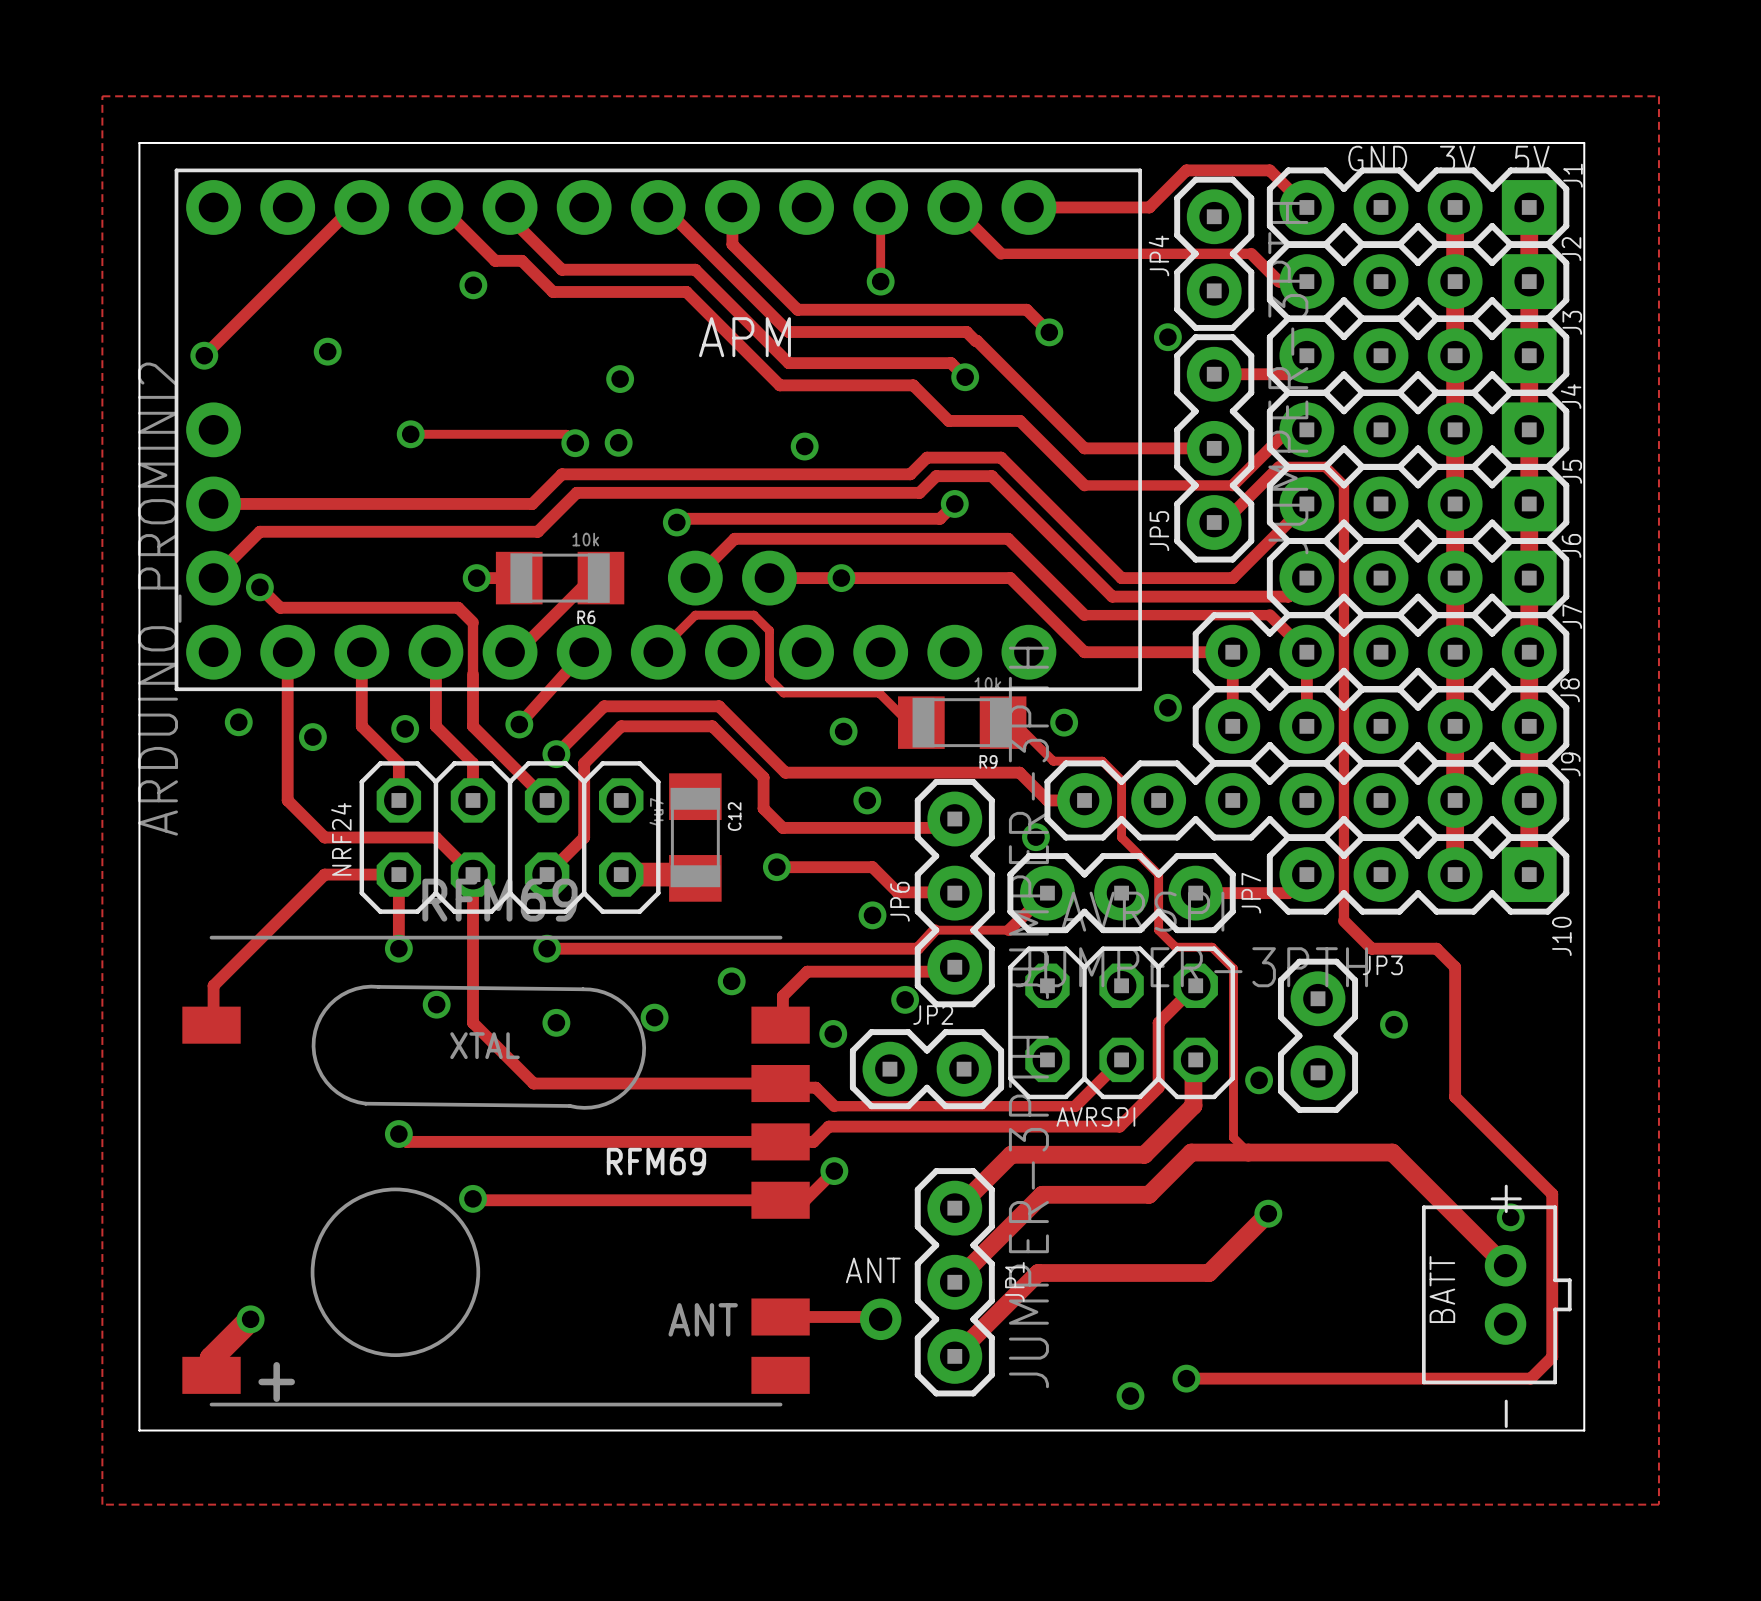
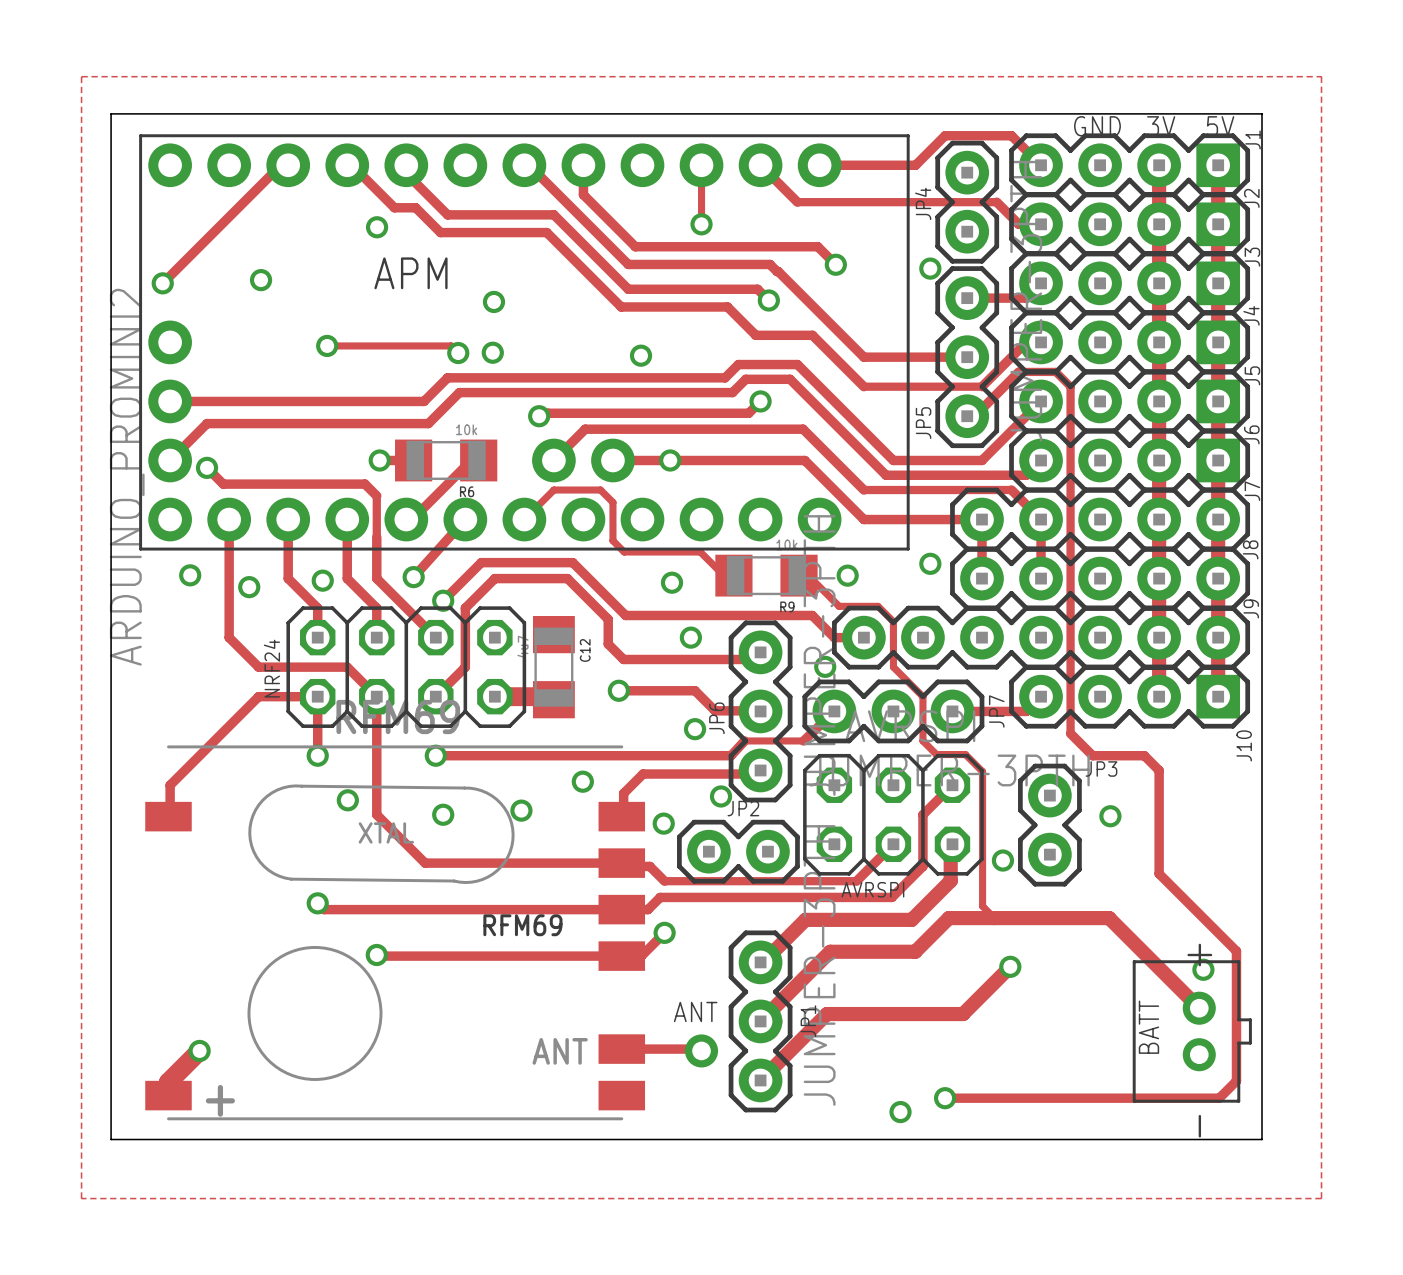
APM name position: APM (744, 337) -> APM (410, 273)

